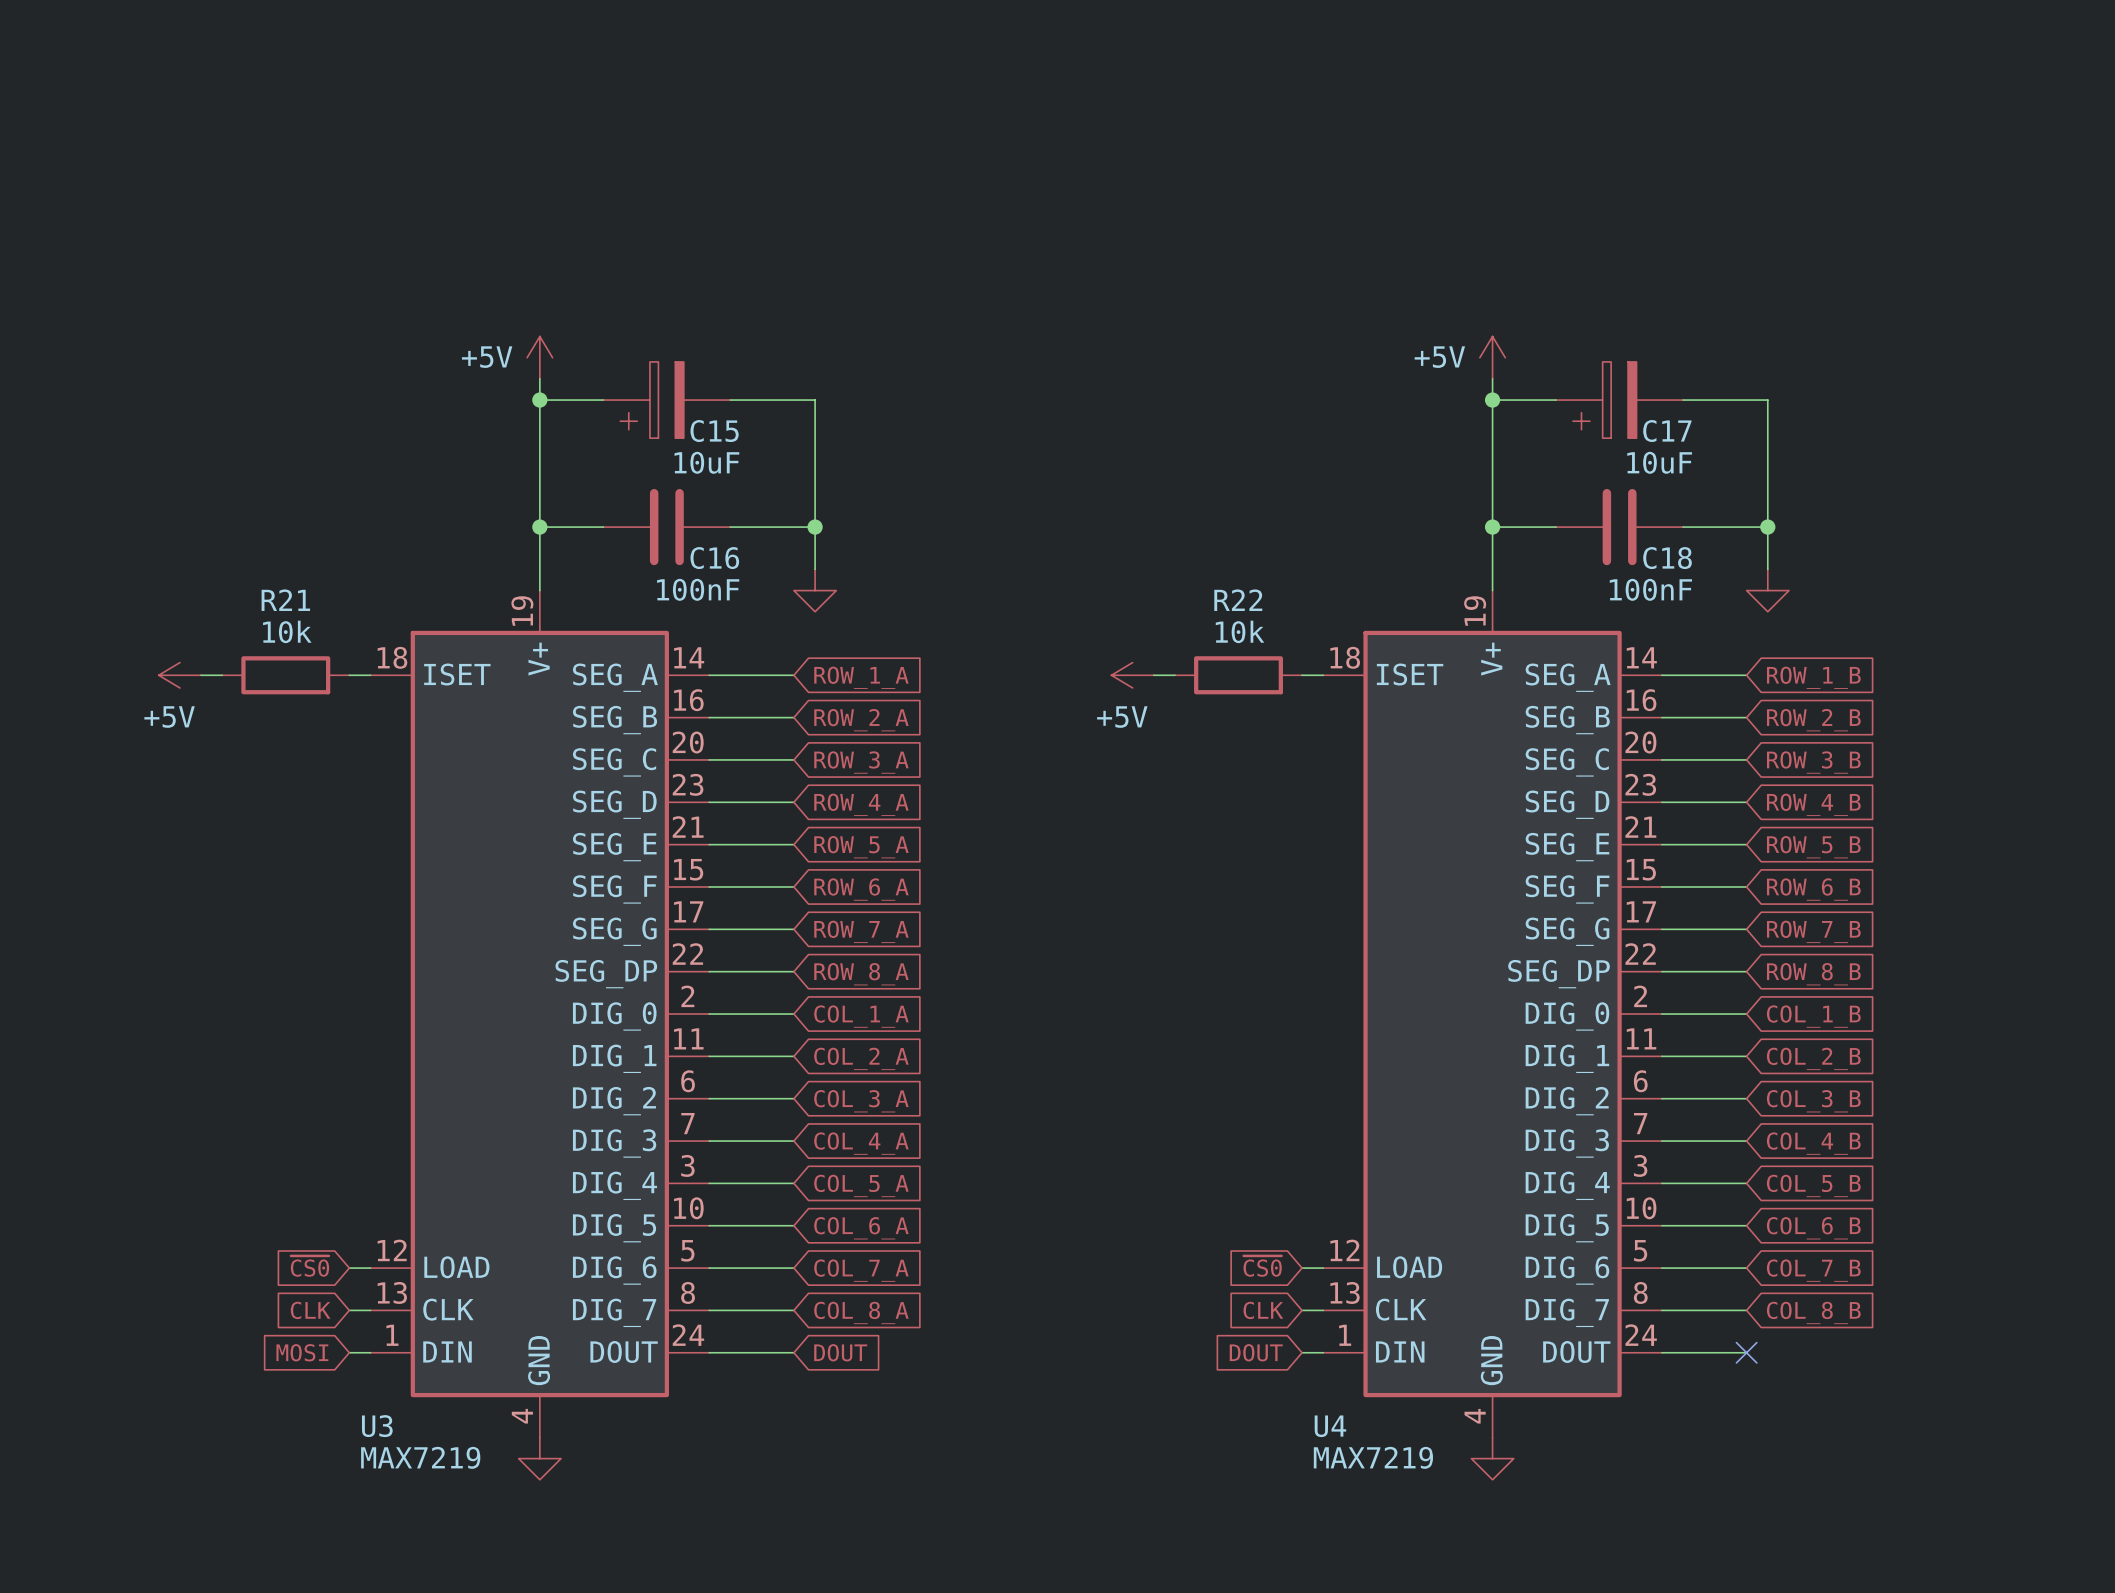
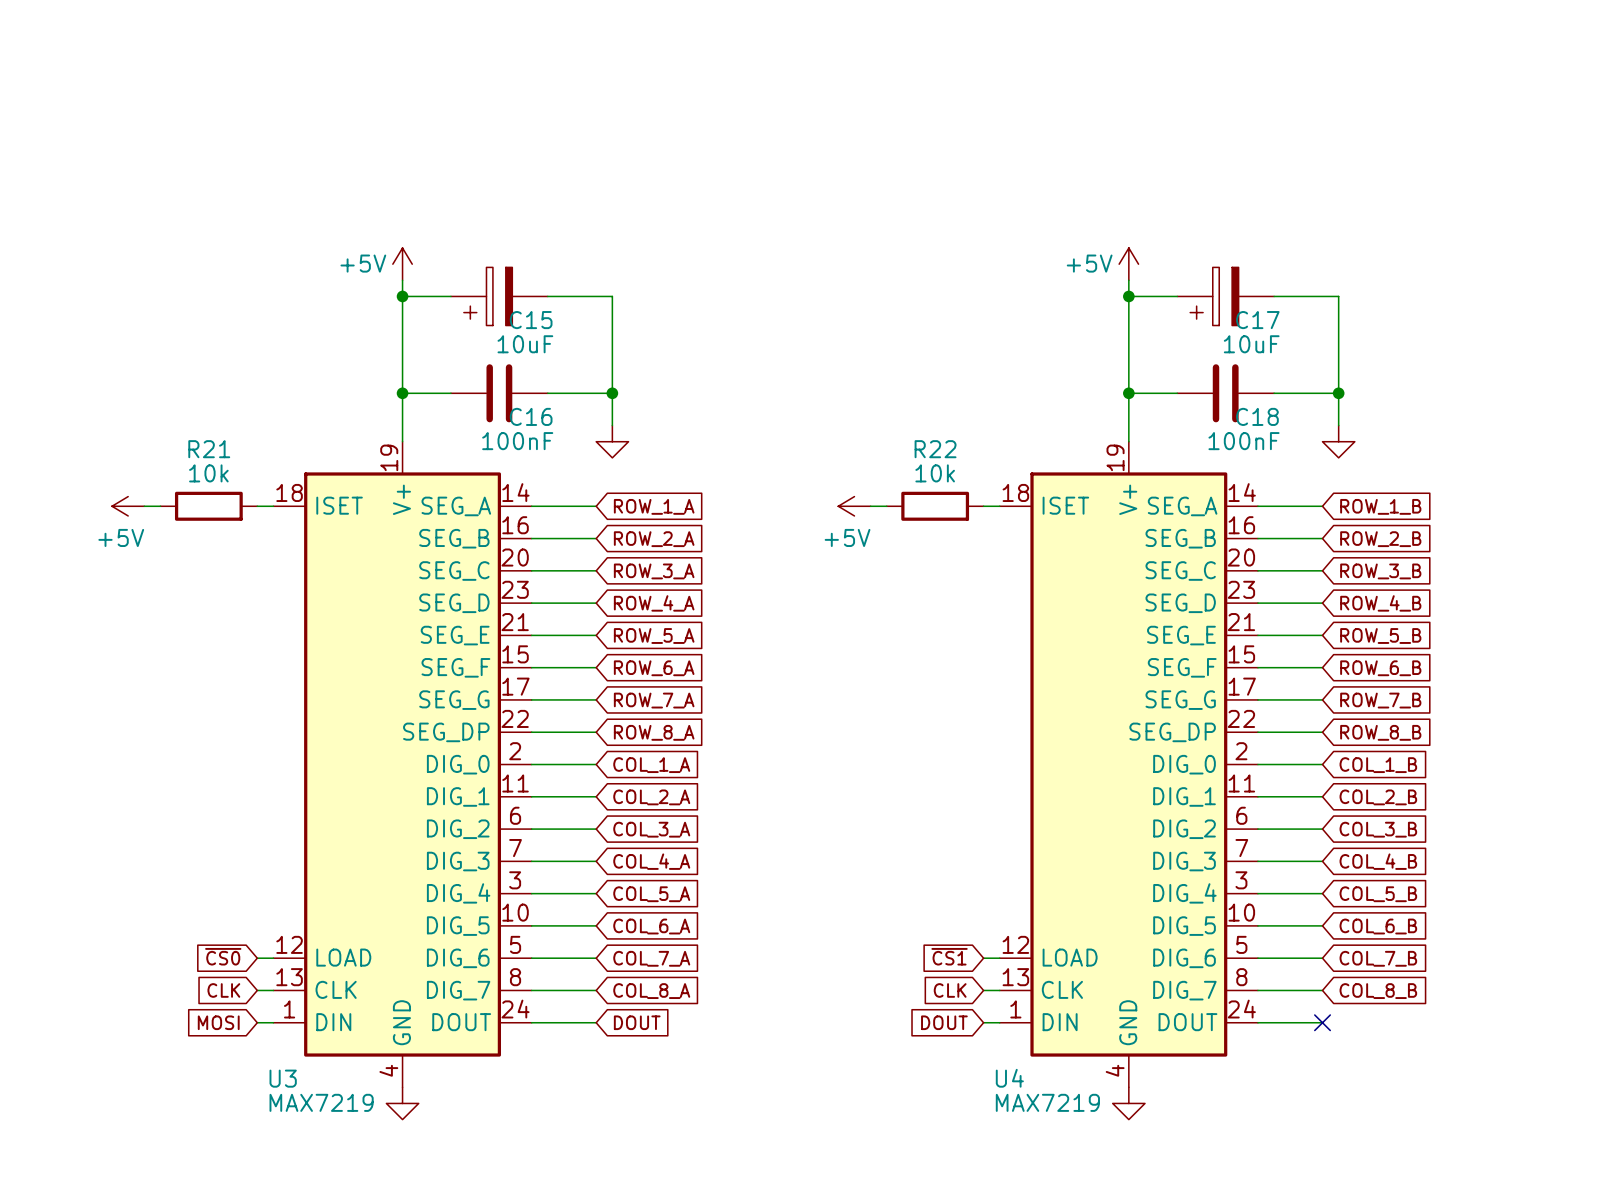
global label: ~{CS0} (1262, 1266) -> ~{CS1} (949, 956)

